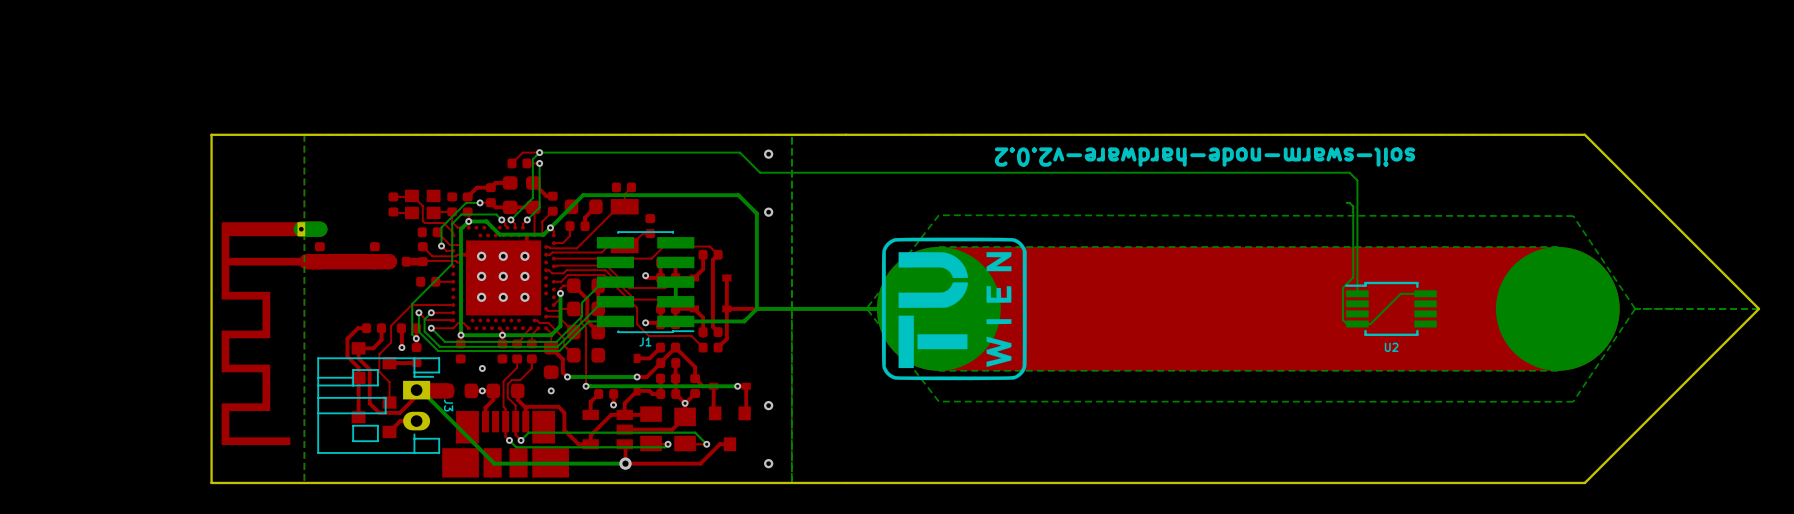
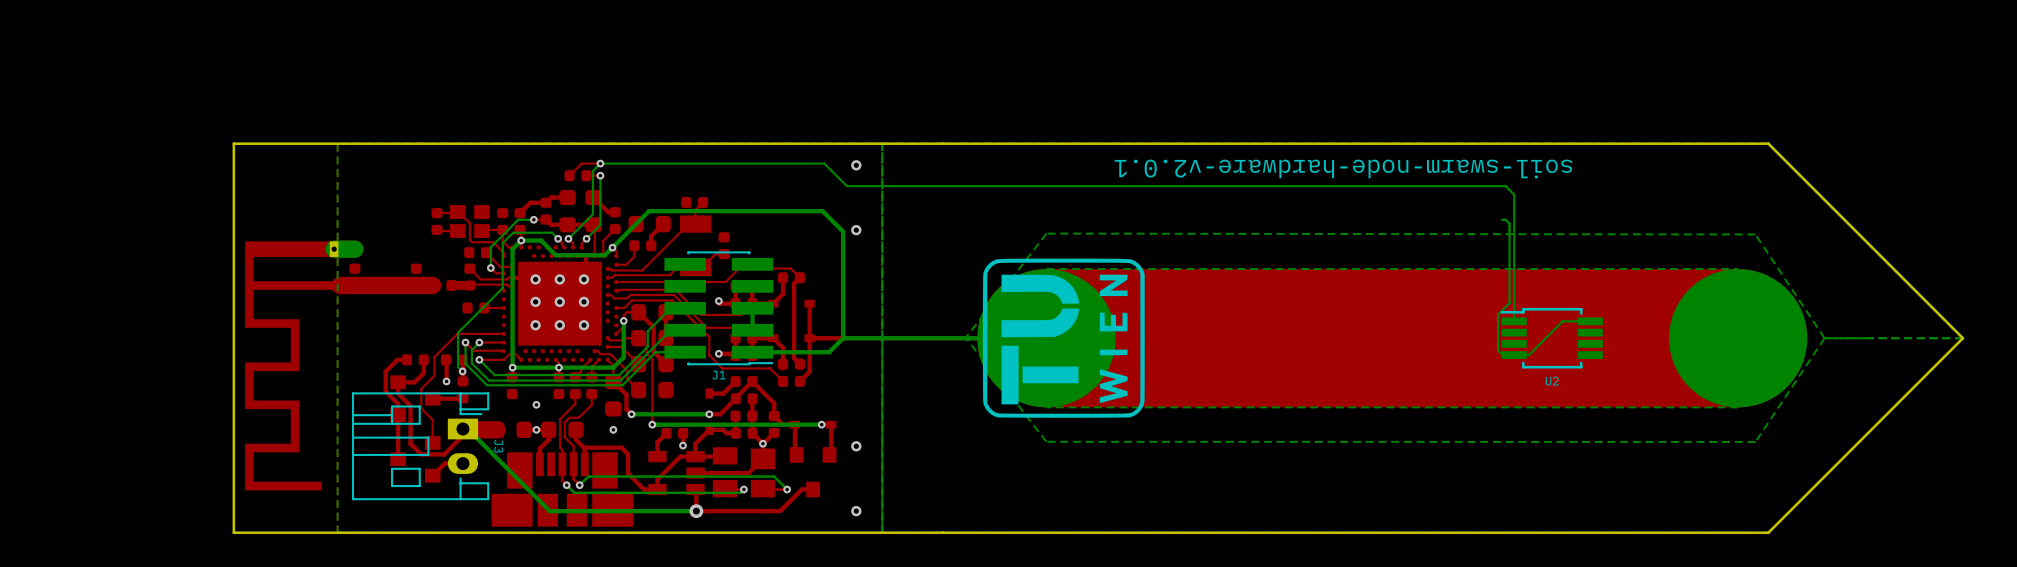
text: soil-swarm-node-hardware-v2.0.2 (1205, 157) -> soil-swarm-node-hardware-v2.0.1 (1343, 169)

